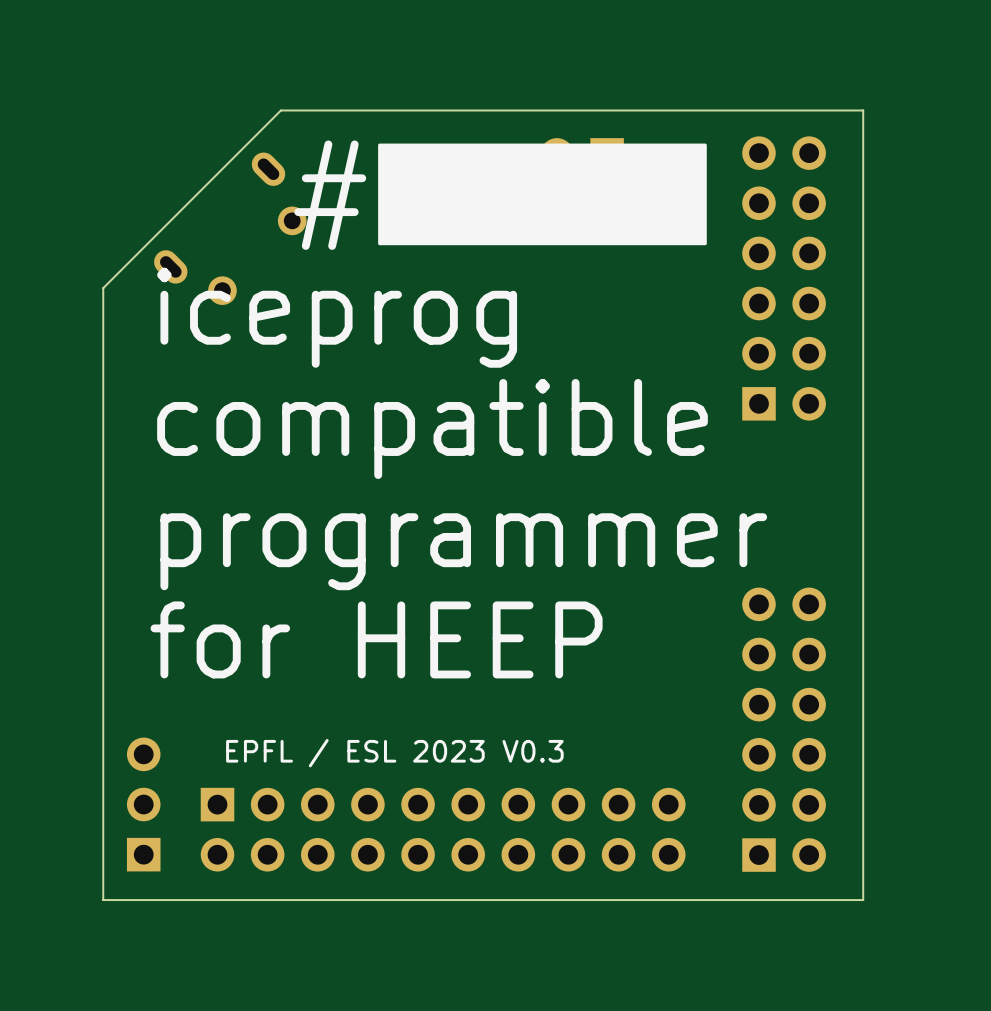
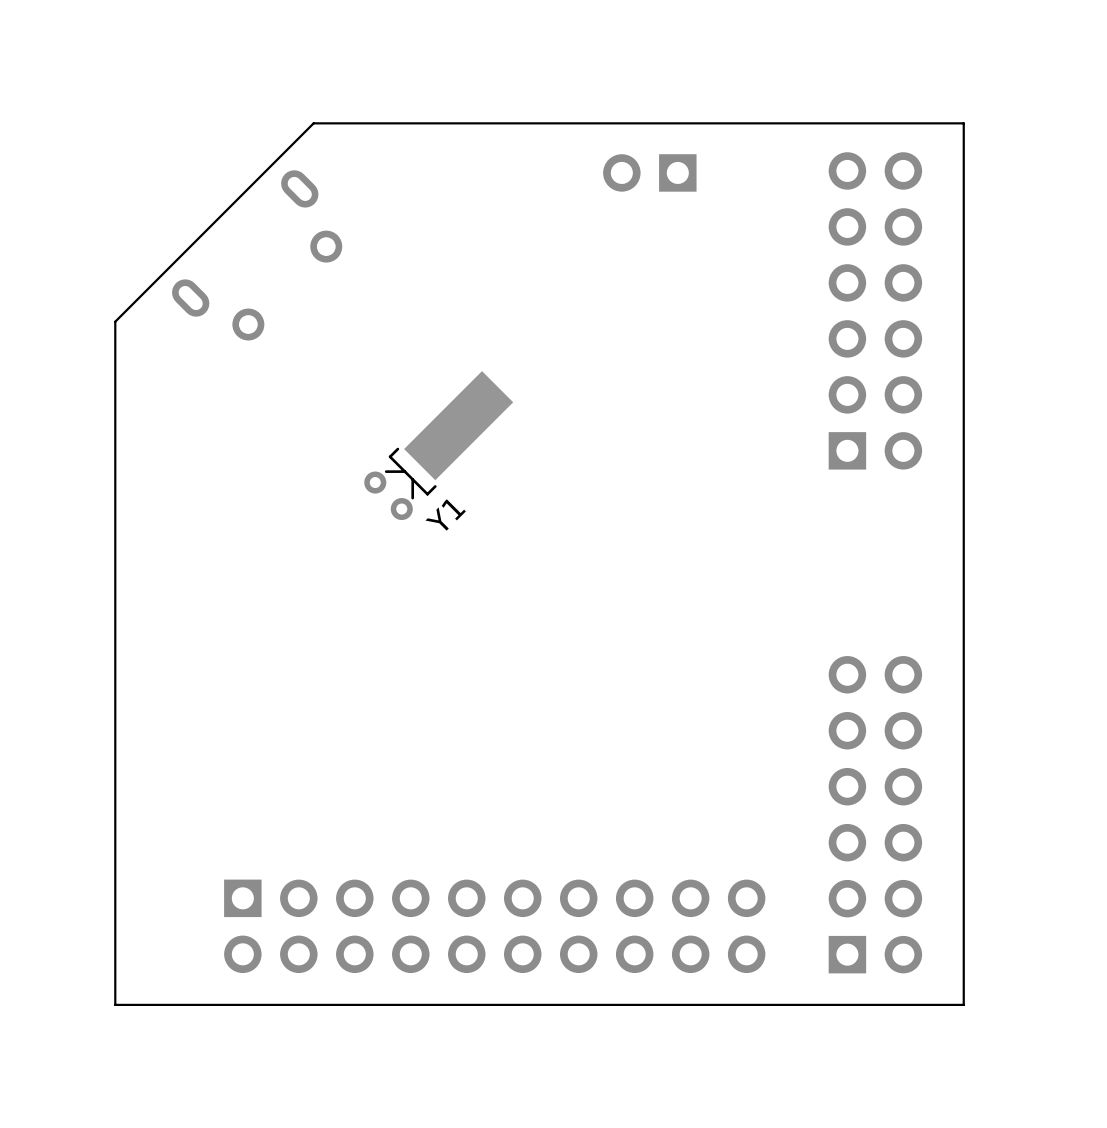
drawing: [378, 143, 707, 246] -> none
text: # (330, 195) -> none
text: iceprog (337, 317) -> none
Y1: none -> (438, 445)
text: compatible (432, 428) -> none
text: programmer (463, 551) -> none
text: for HEEP (376, 639) -> none
text: EPFL / ESL 2023 V0.3 (394, 753) -> none
part: (143, 804) -> none

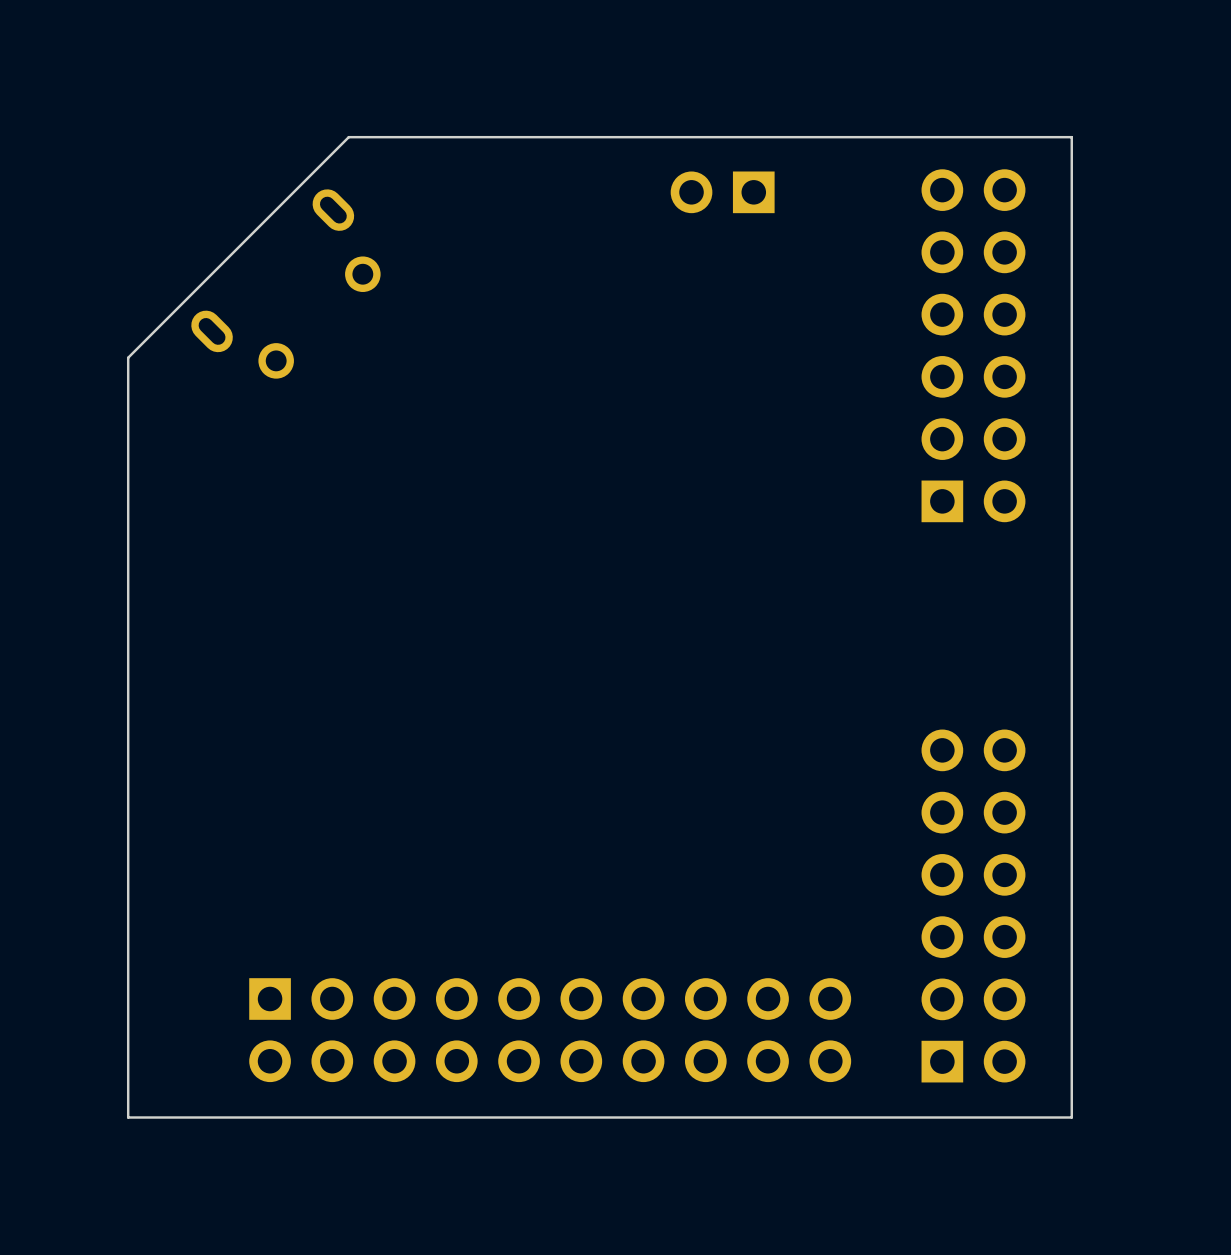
Y1: (438, 445) -> none

